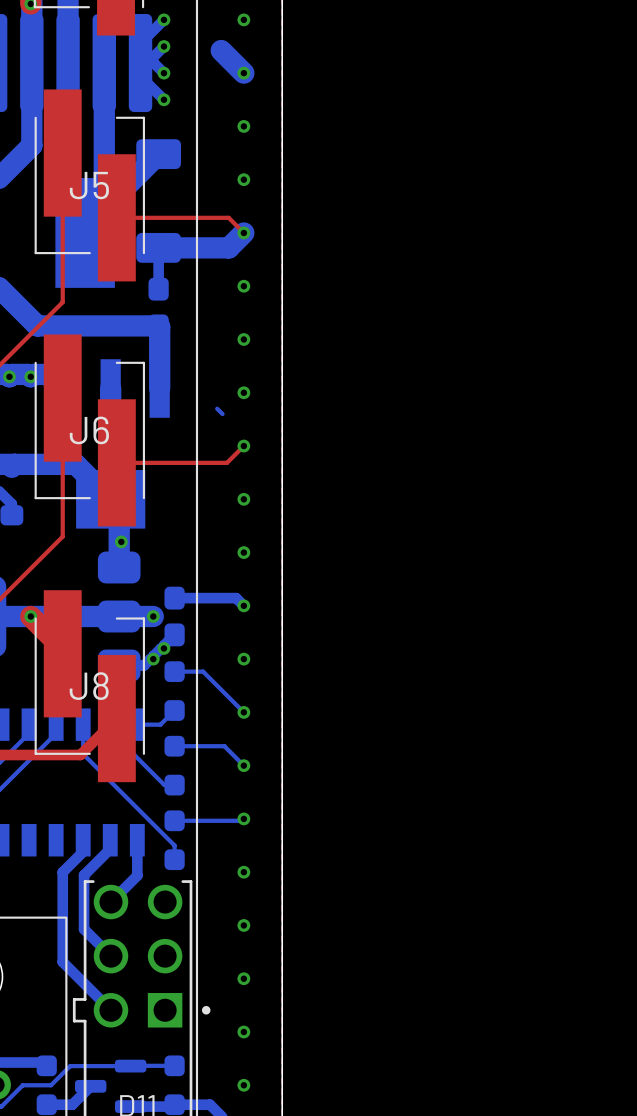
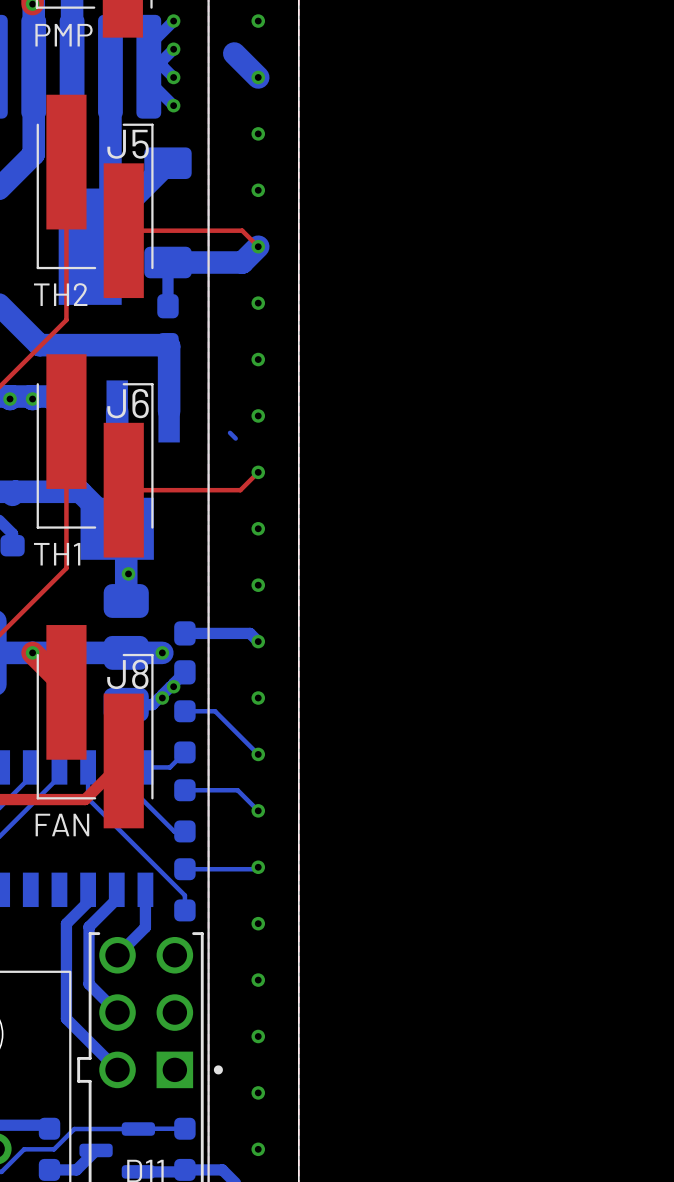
text: none -> PMP (64, 35)
J5 name position: J5 (89, 185) -> J5 (128, 144)
text: none -> TH2 (60, 294)
J6 name position: J6 (89, 430) -> J6 (128, 403)
text: none -> TH1 (57, 554)
J8 name position: J8 (89, 686) -> J8 (127, 674)
text: none -> FAN (62, 825)

